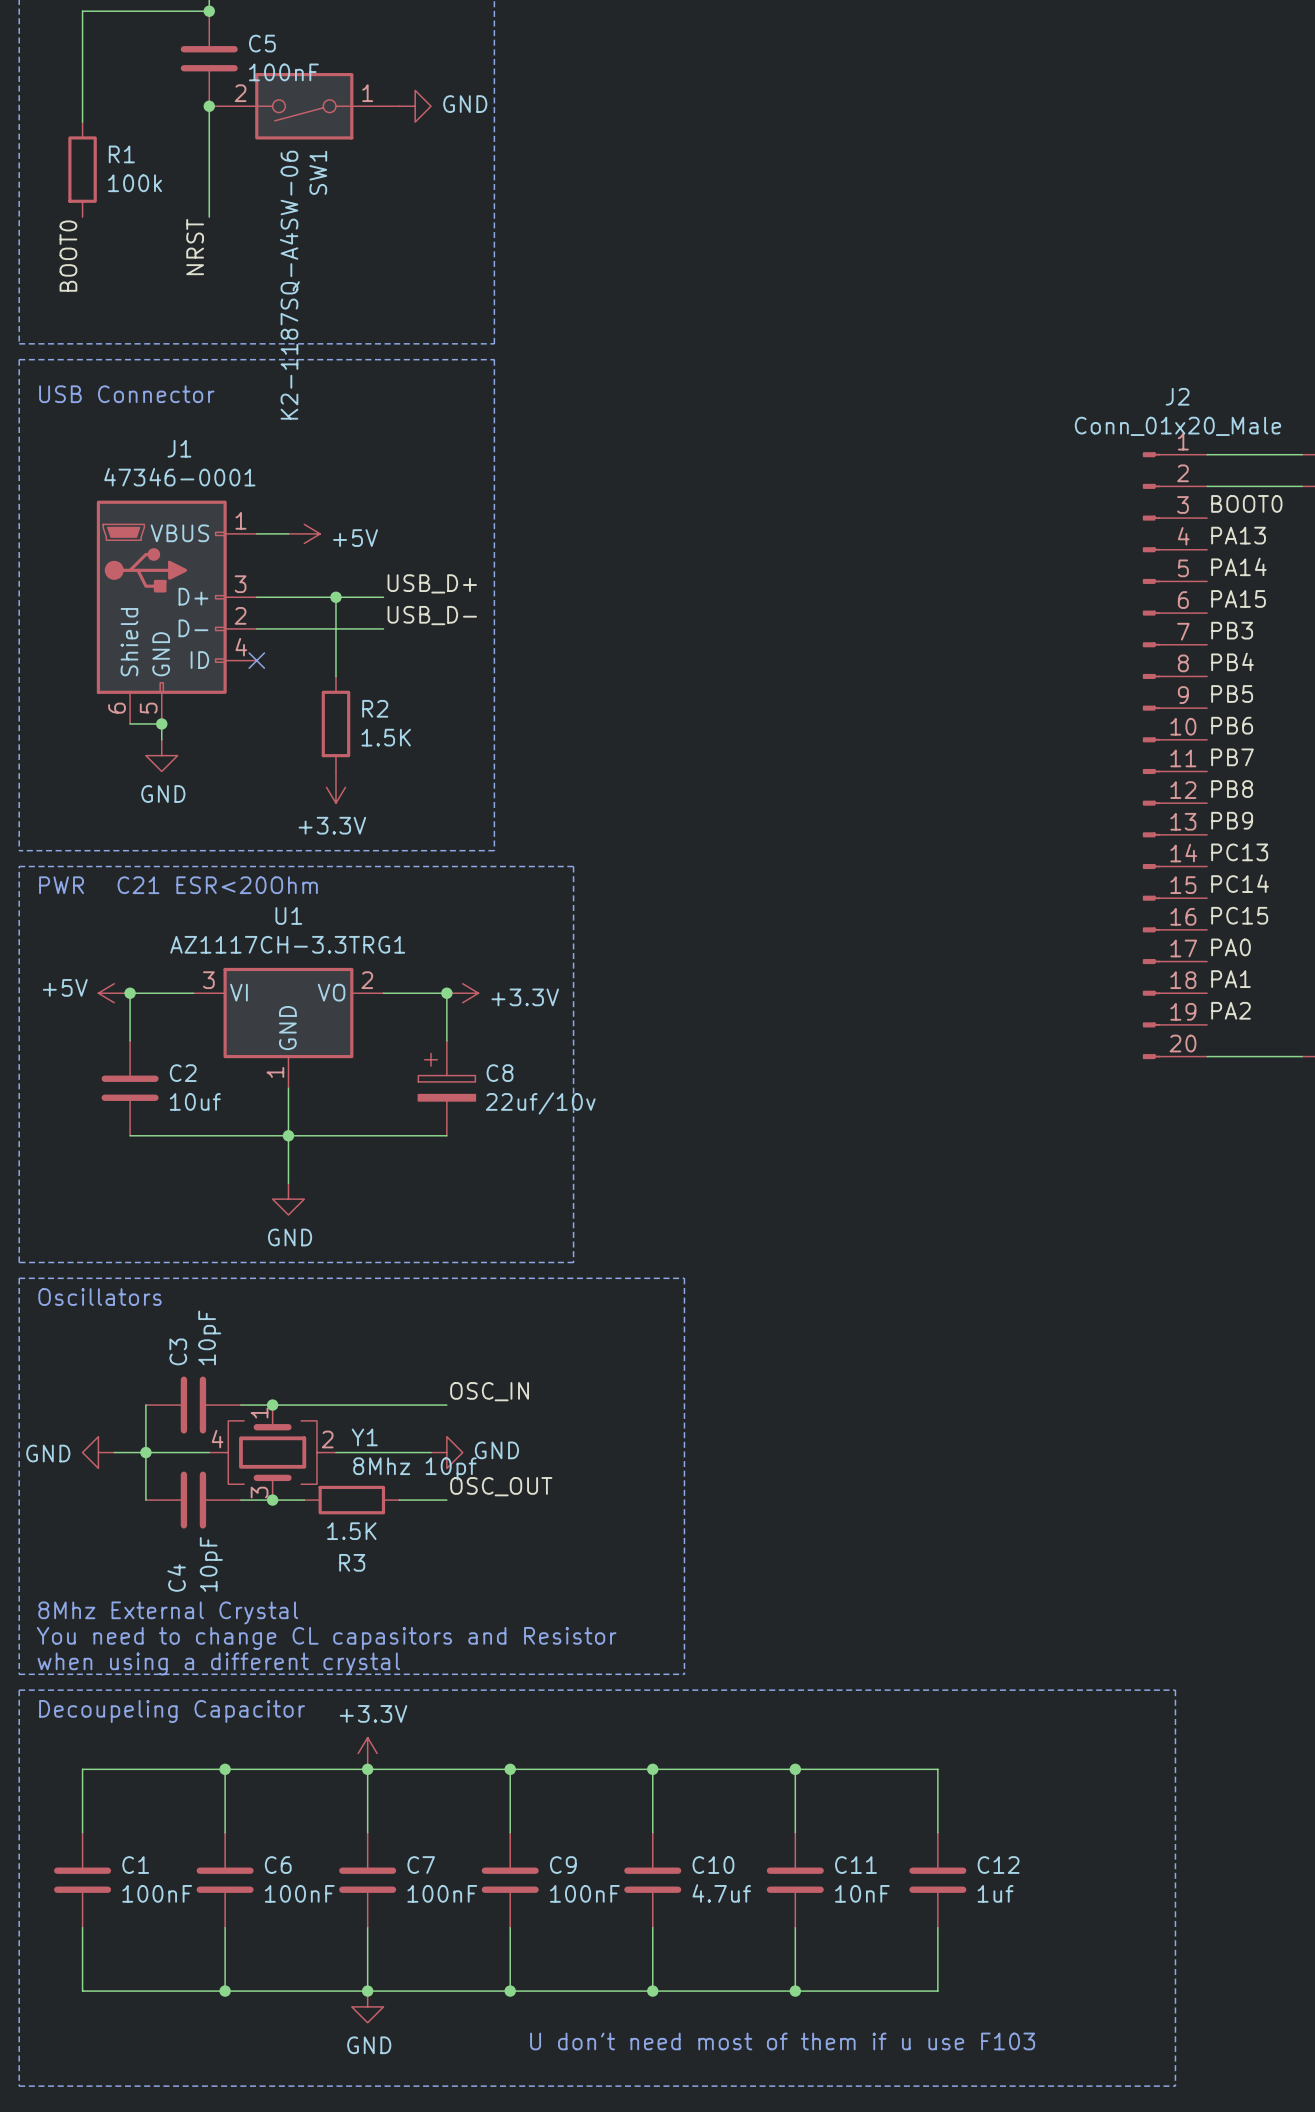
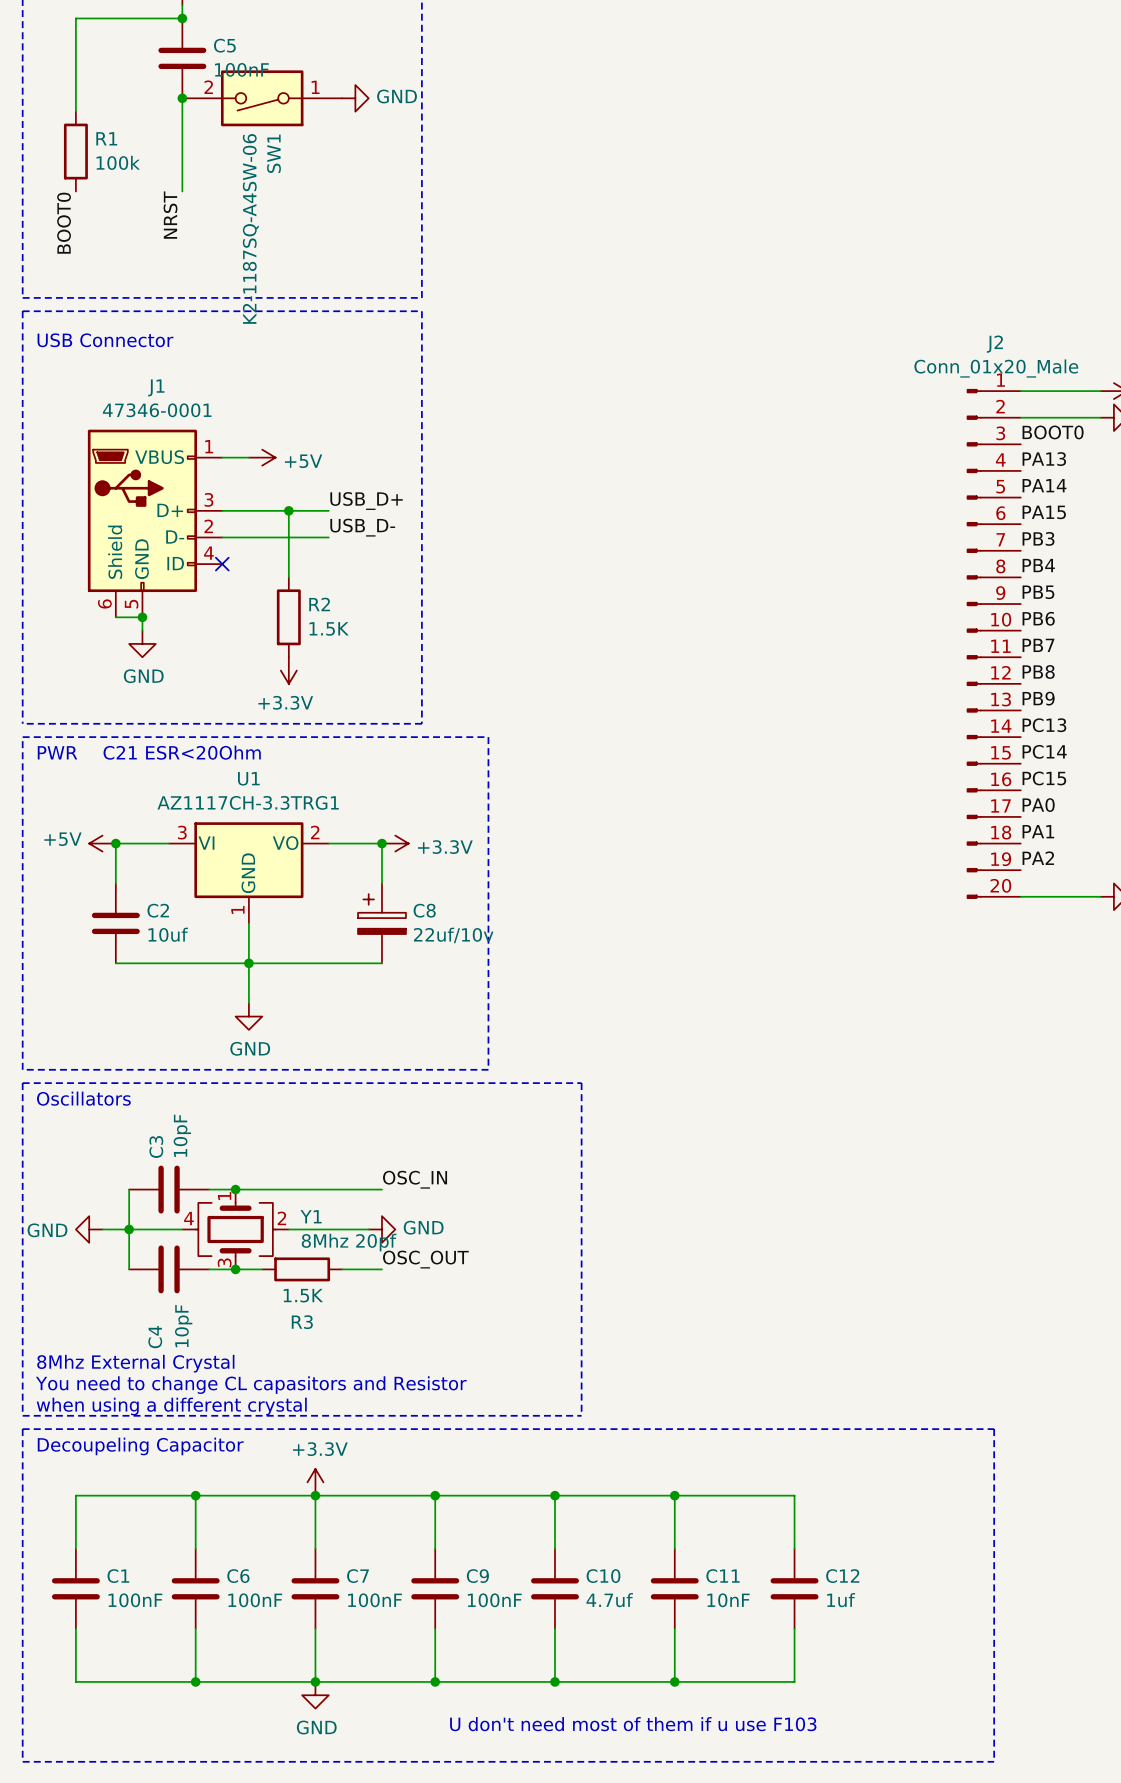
Y1 value: 8Mhz 10pf (414, 1468) -> 8Mhz 20pf (349, 1242)

